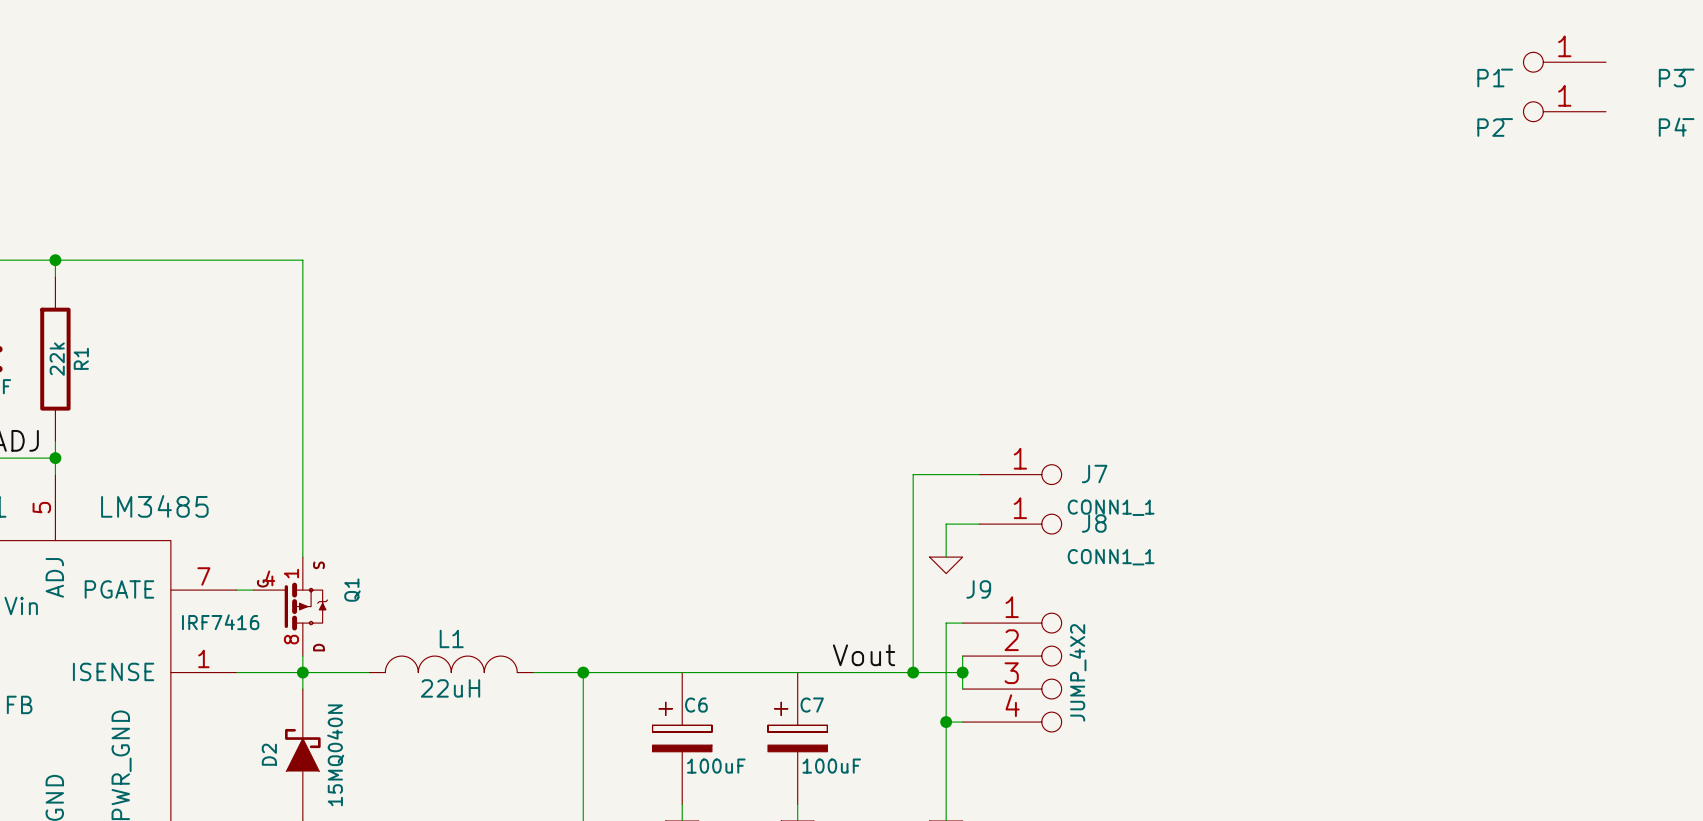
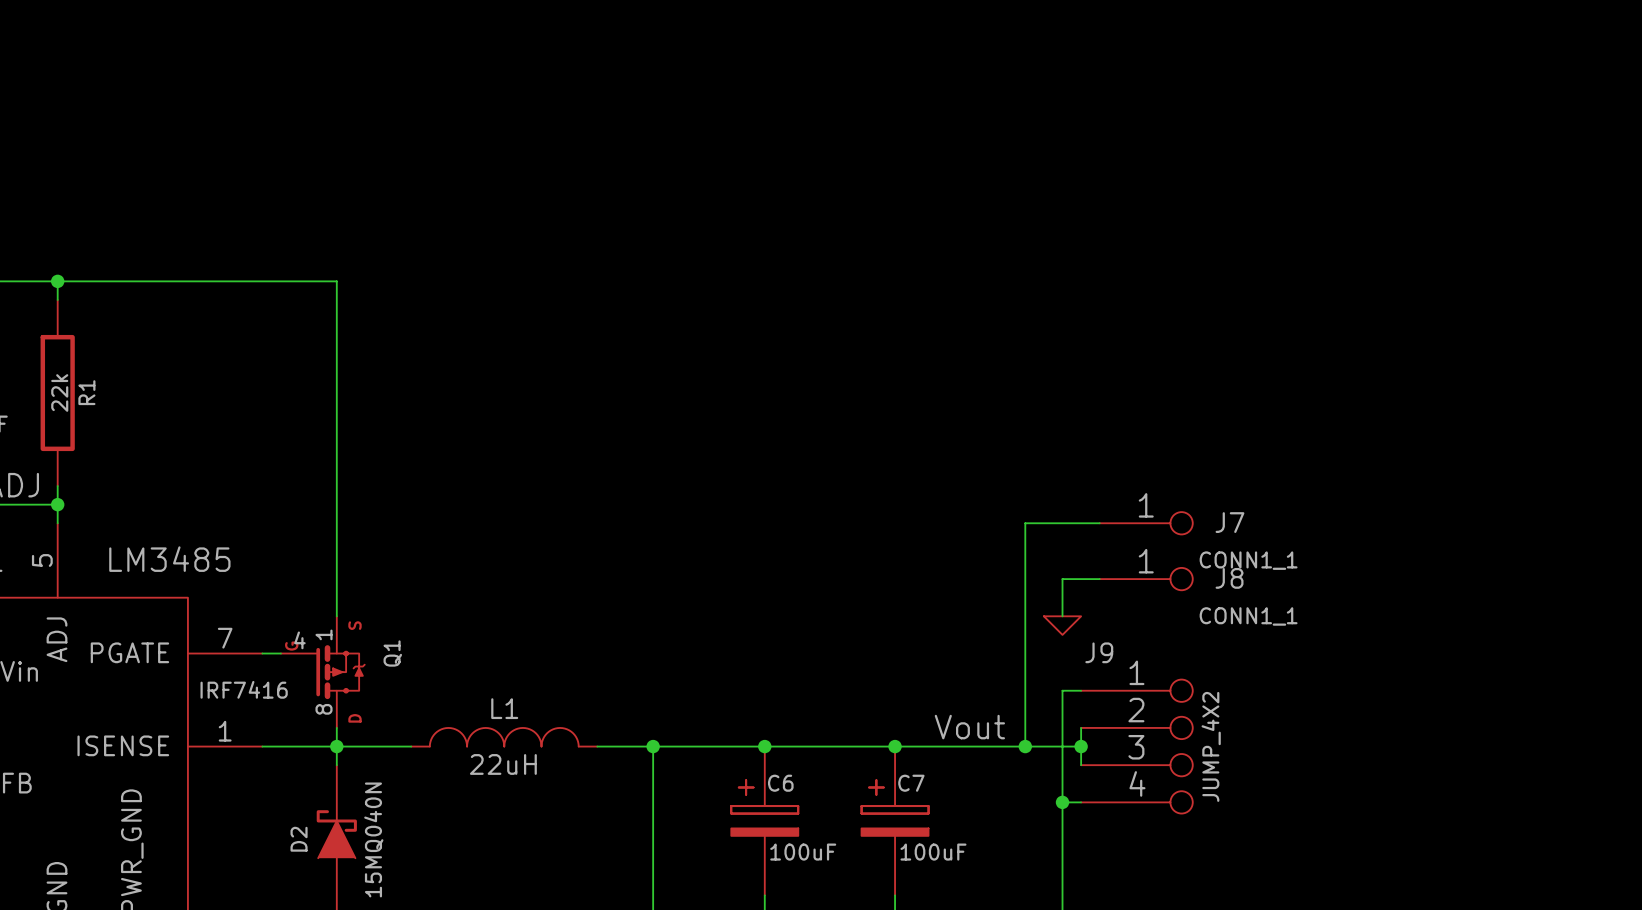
junction: none -> (764, 746)
junction: none -> (895, 746)

